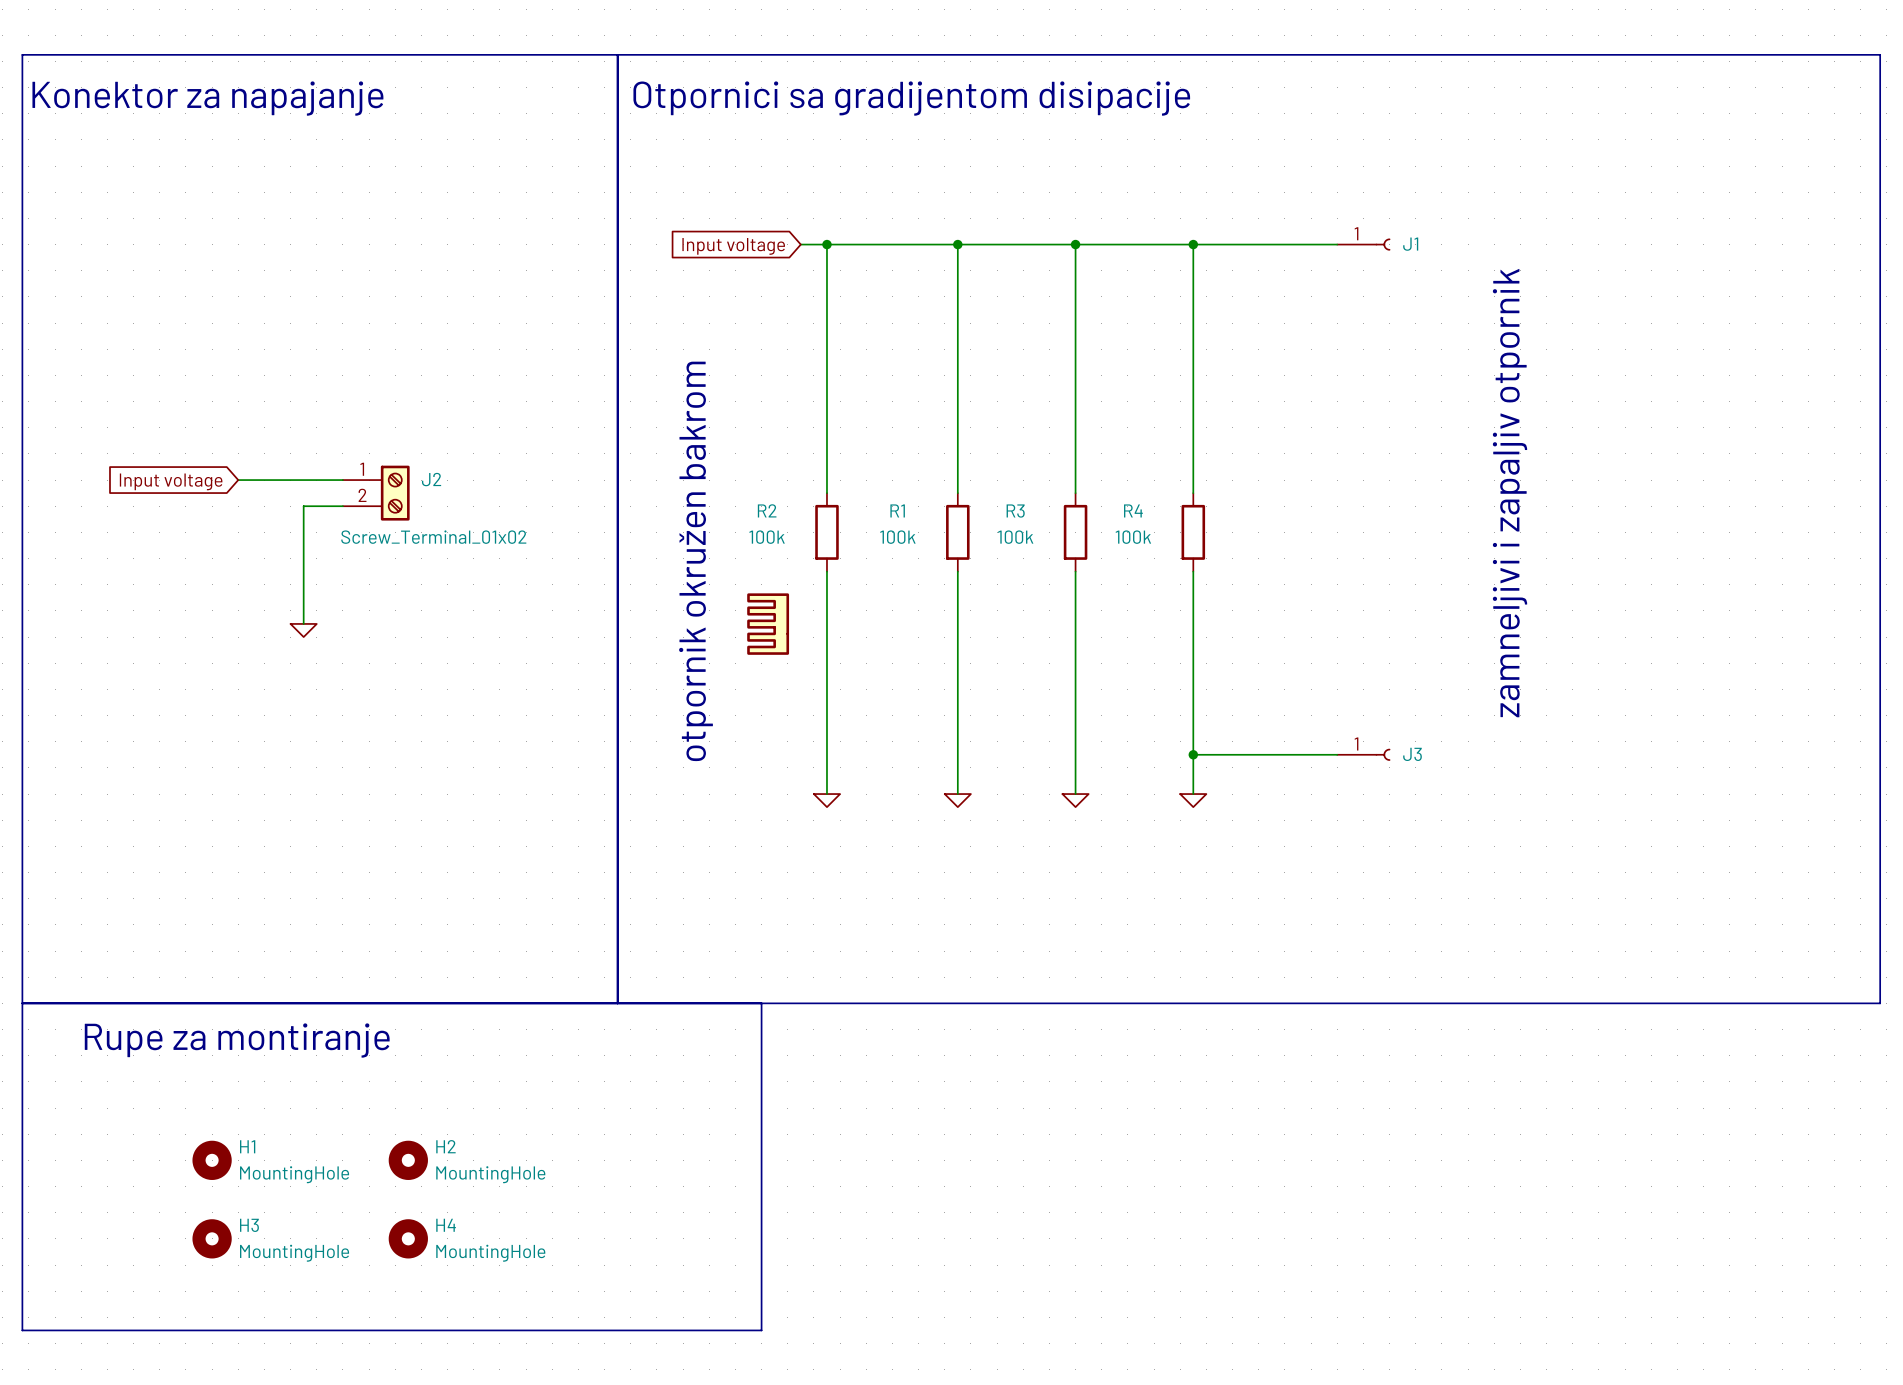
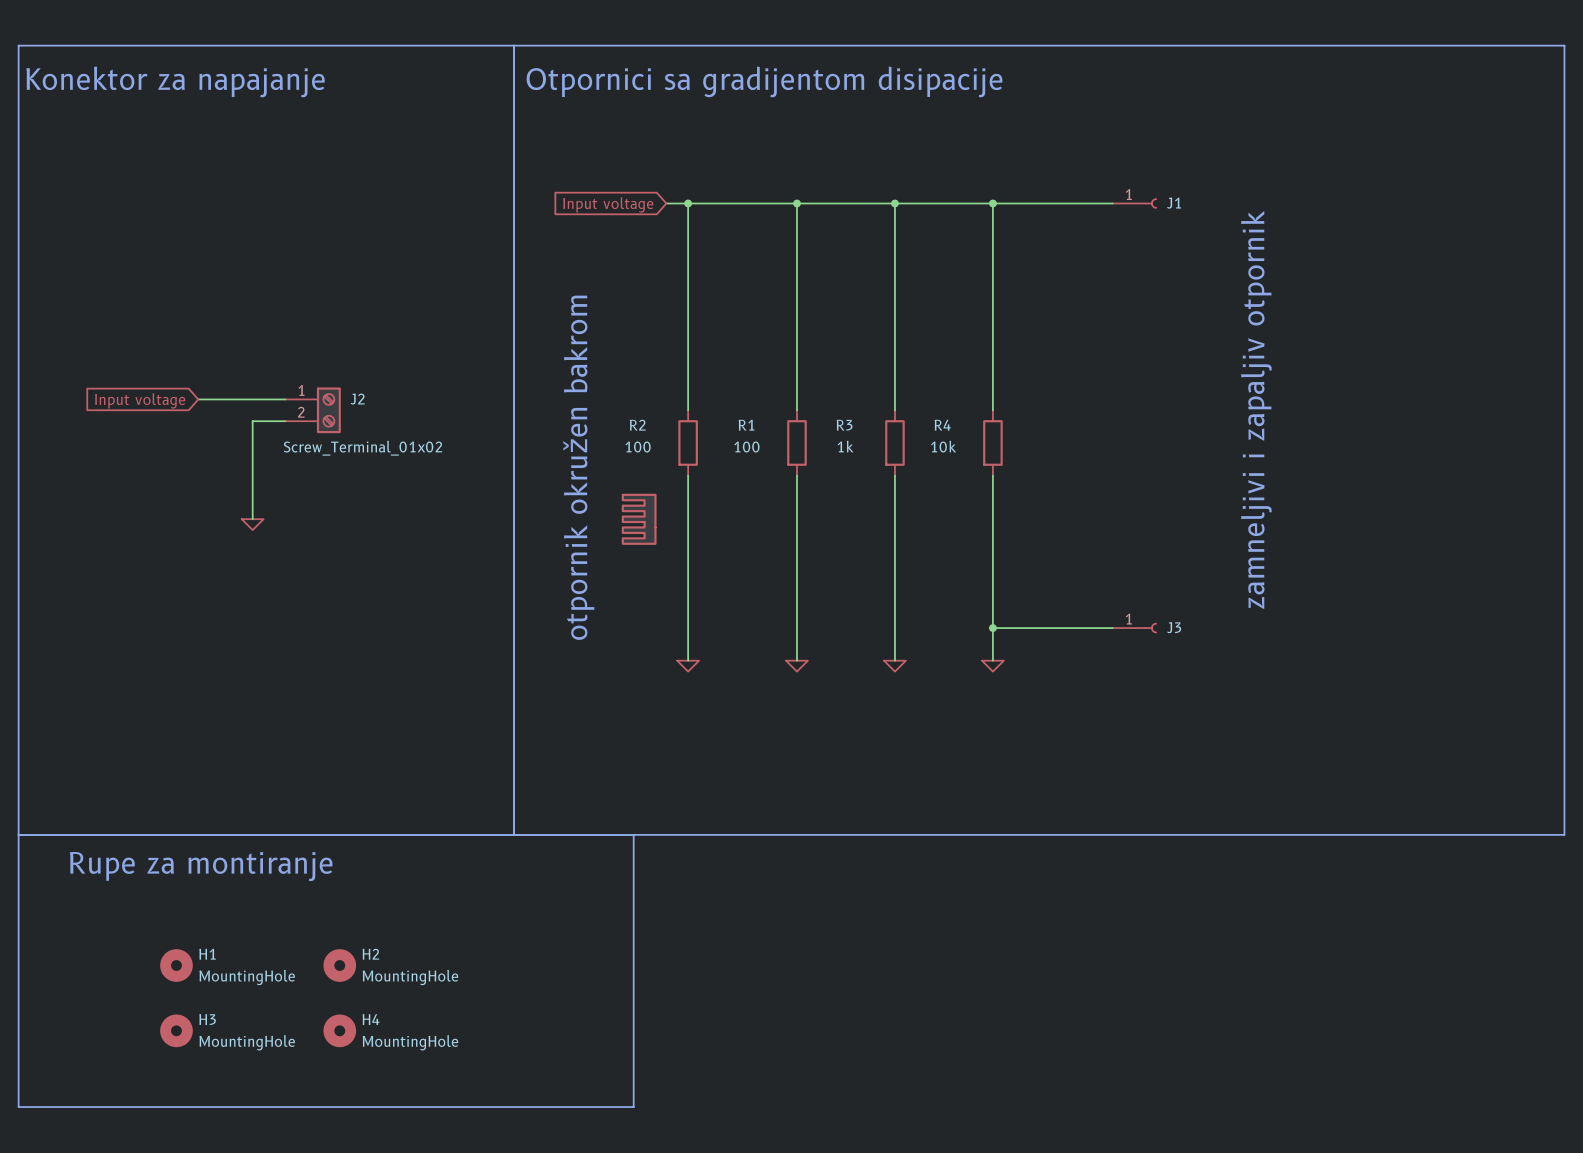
R2 value: 100k (767, 537) -> 100 (638, 446)
R1 value: 100k (897, 537) -> 100 (746, 446)
R3 value: 100k (1015, 537) -> 1k (845, 446)
R4 value: 100k (1133, 537) -> 10k (943, 446)

